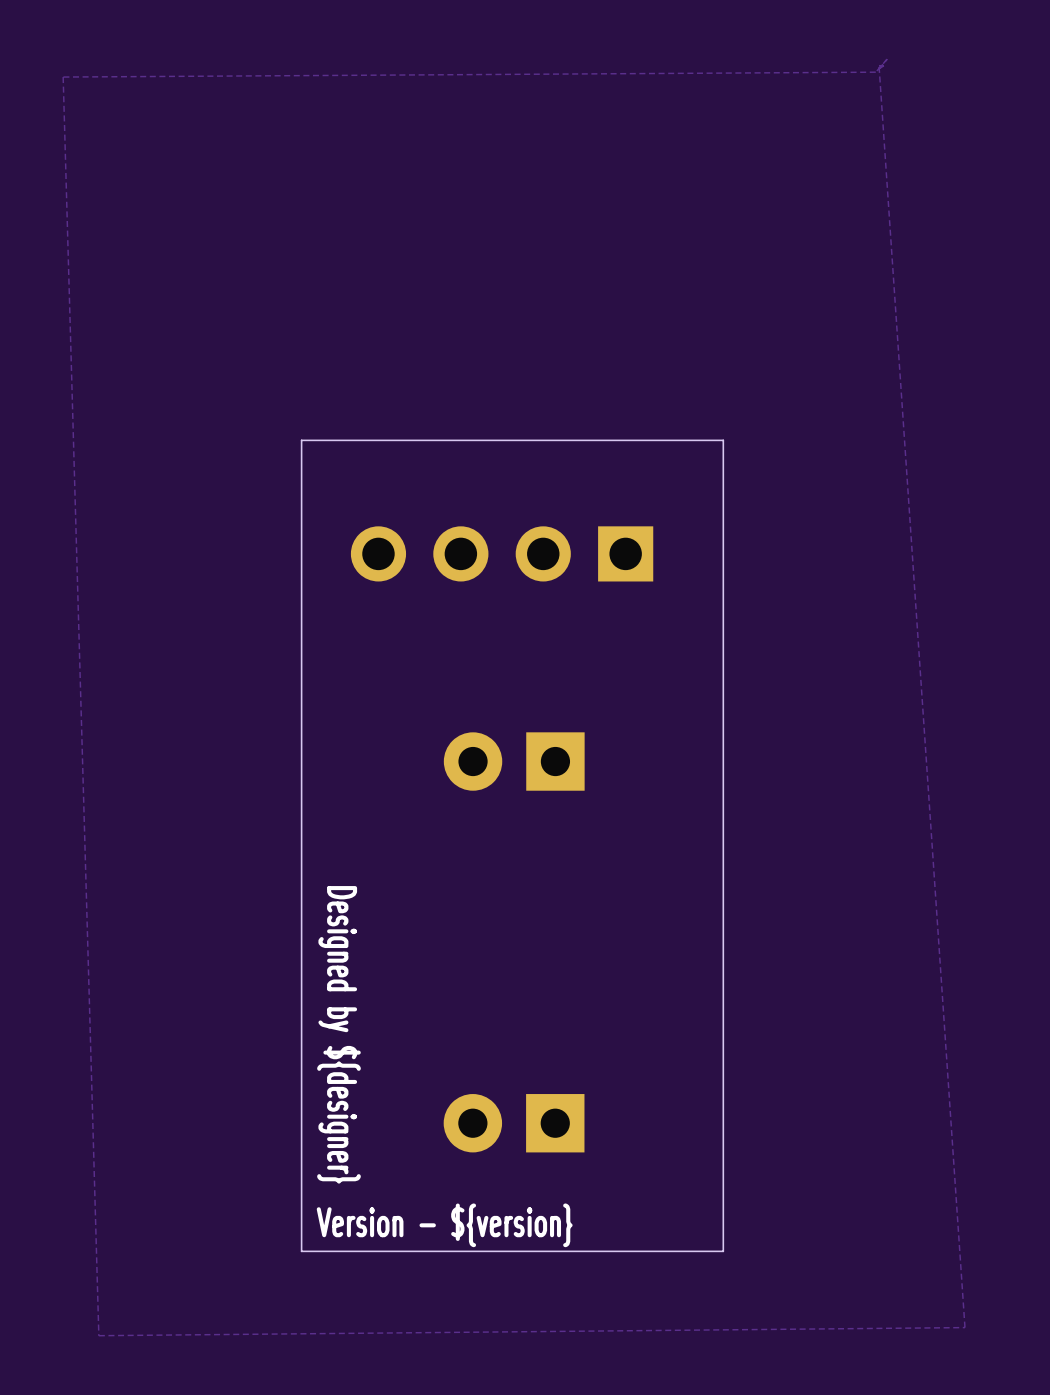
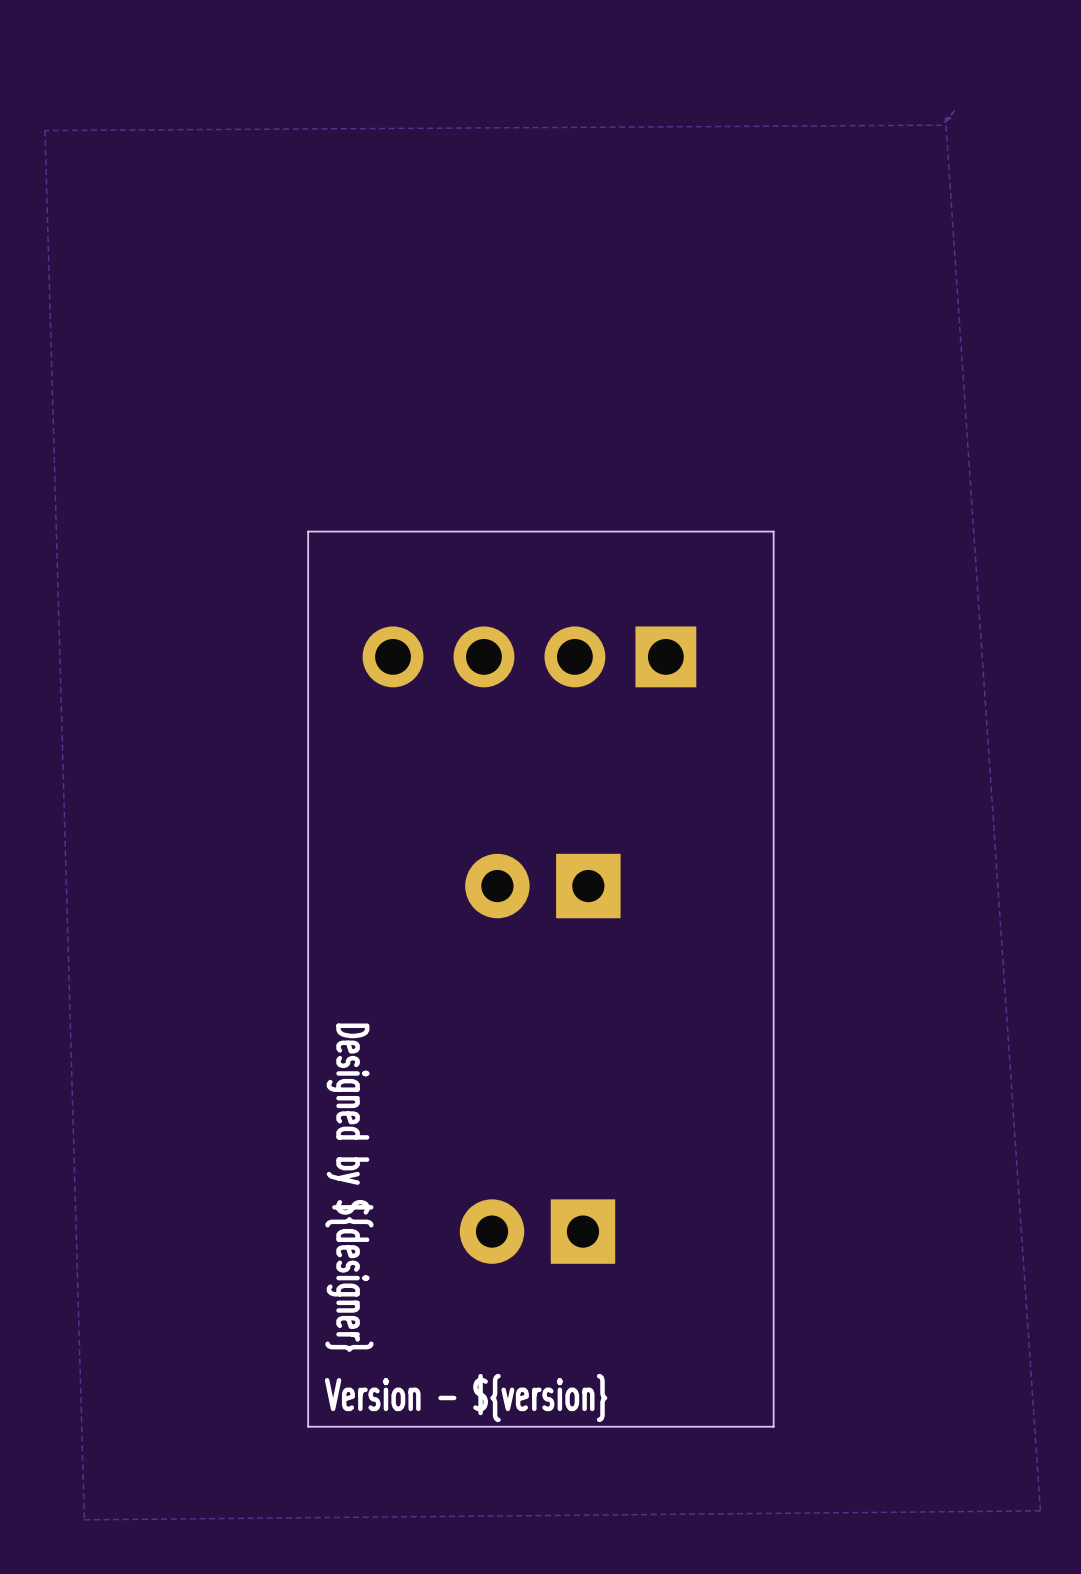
part position: (514, 1123) -> (537, 1231)

